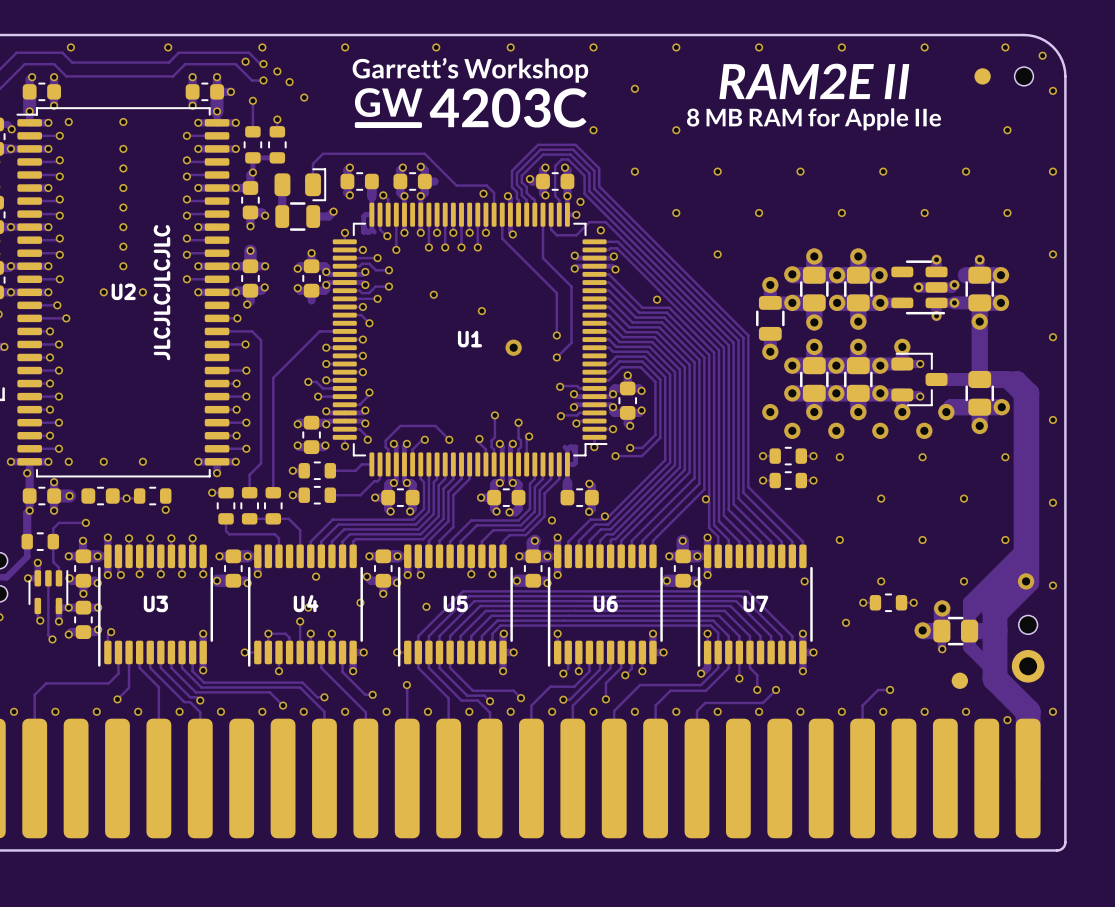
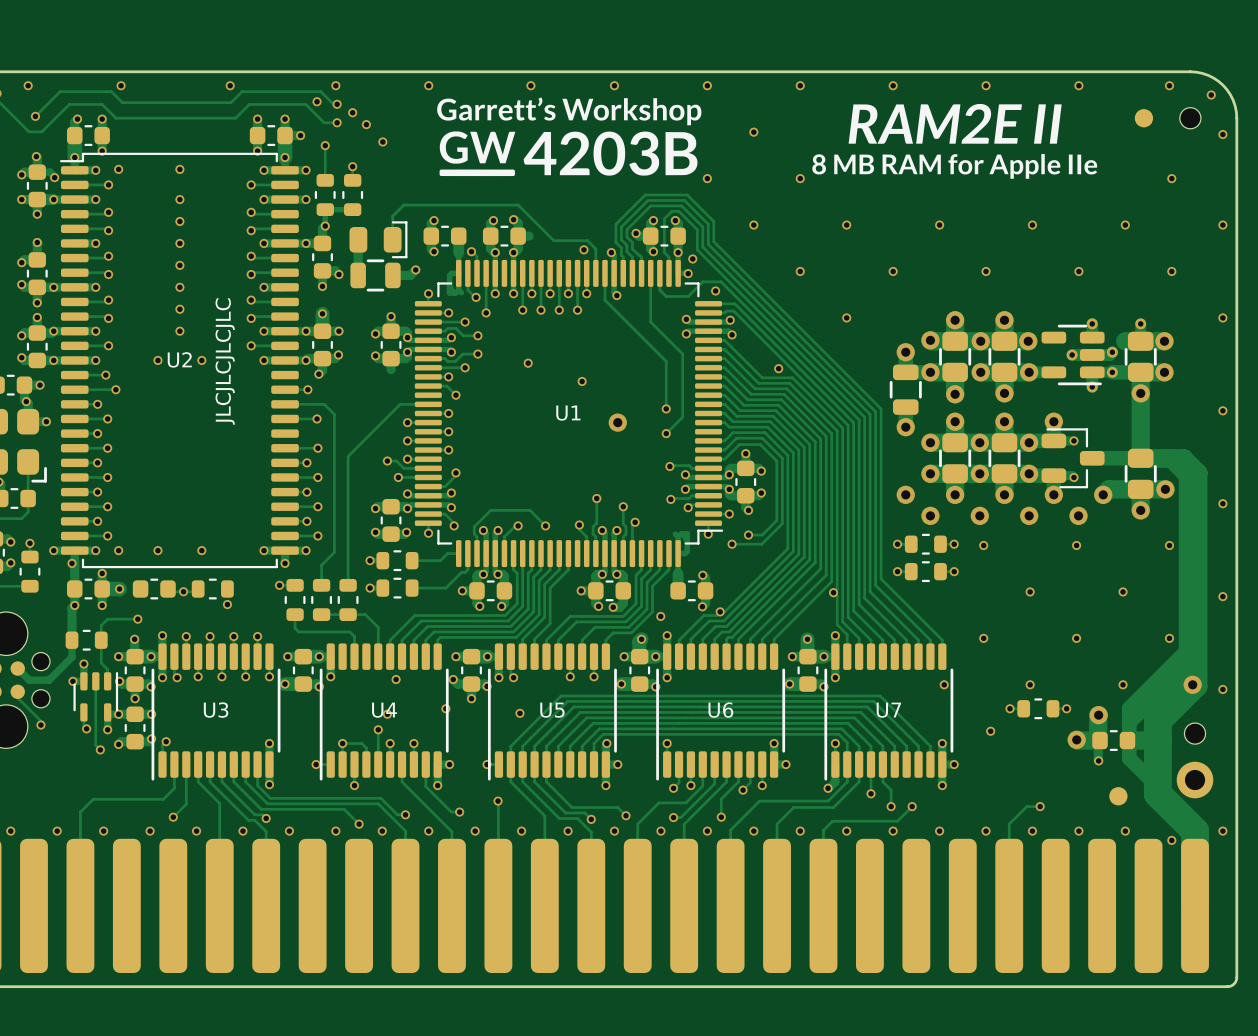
drawing shape: [352, 57, 589, 129] -> [437, 97, 702, 177]
part footprint: [933, 616, 979, 646] -> [1092, 730, 1136, 751]

